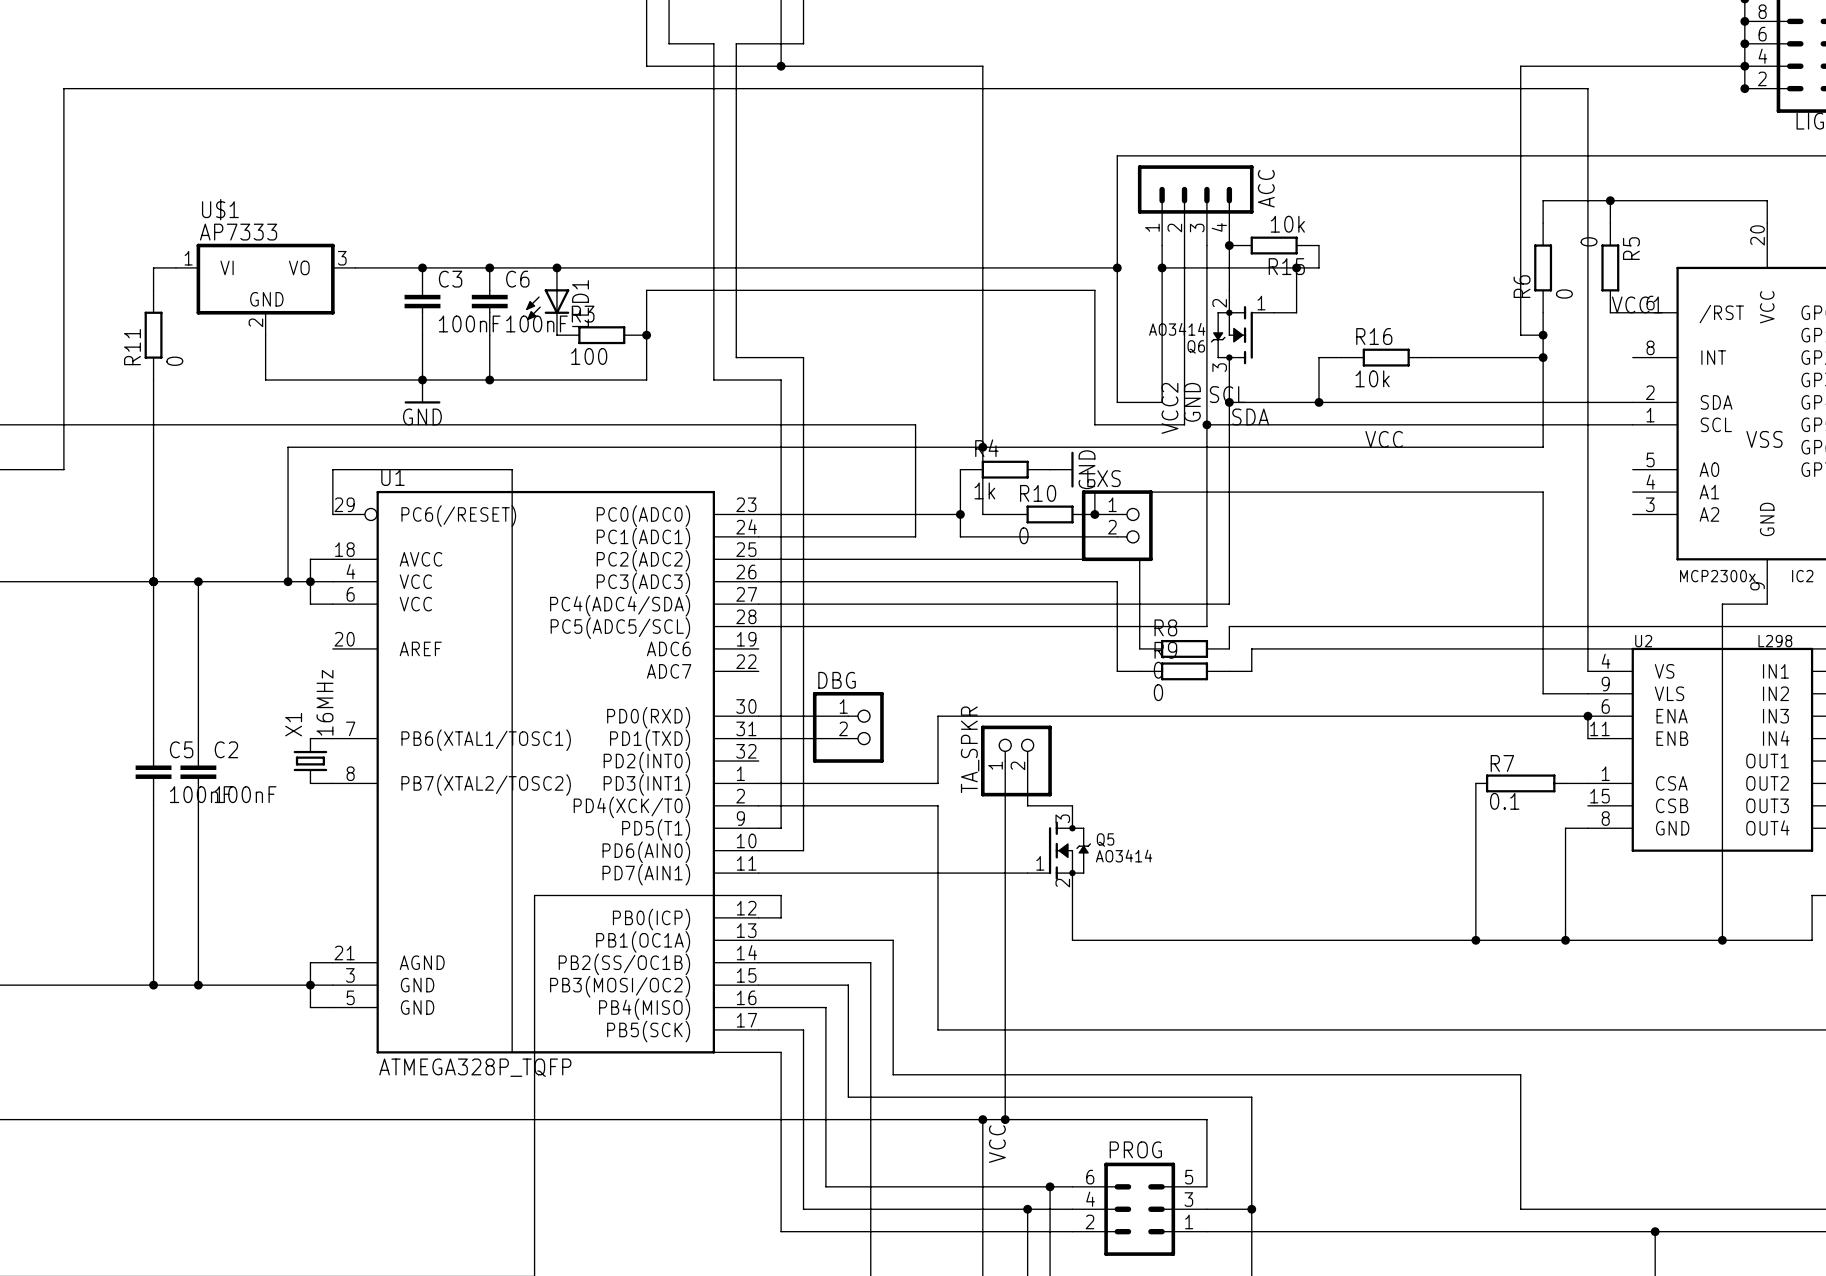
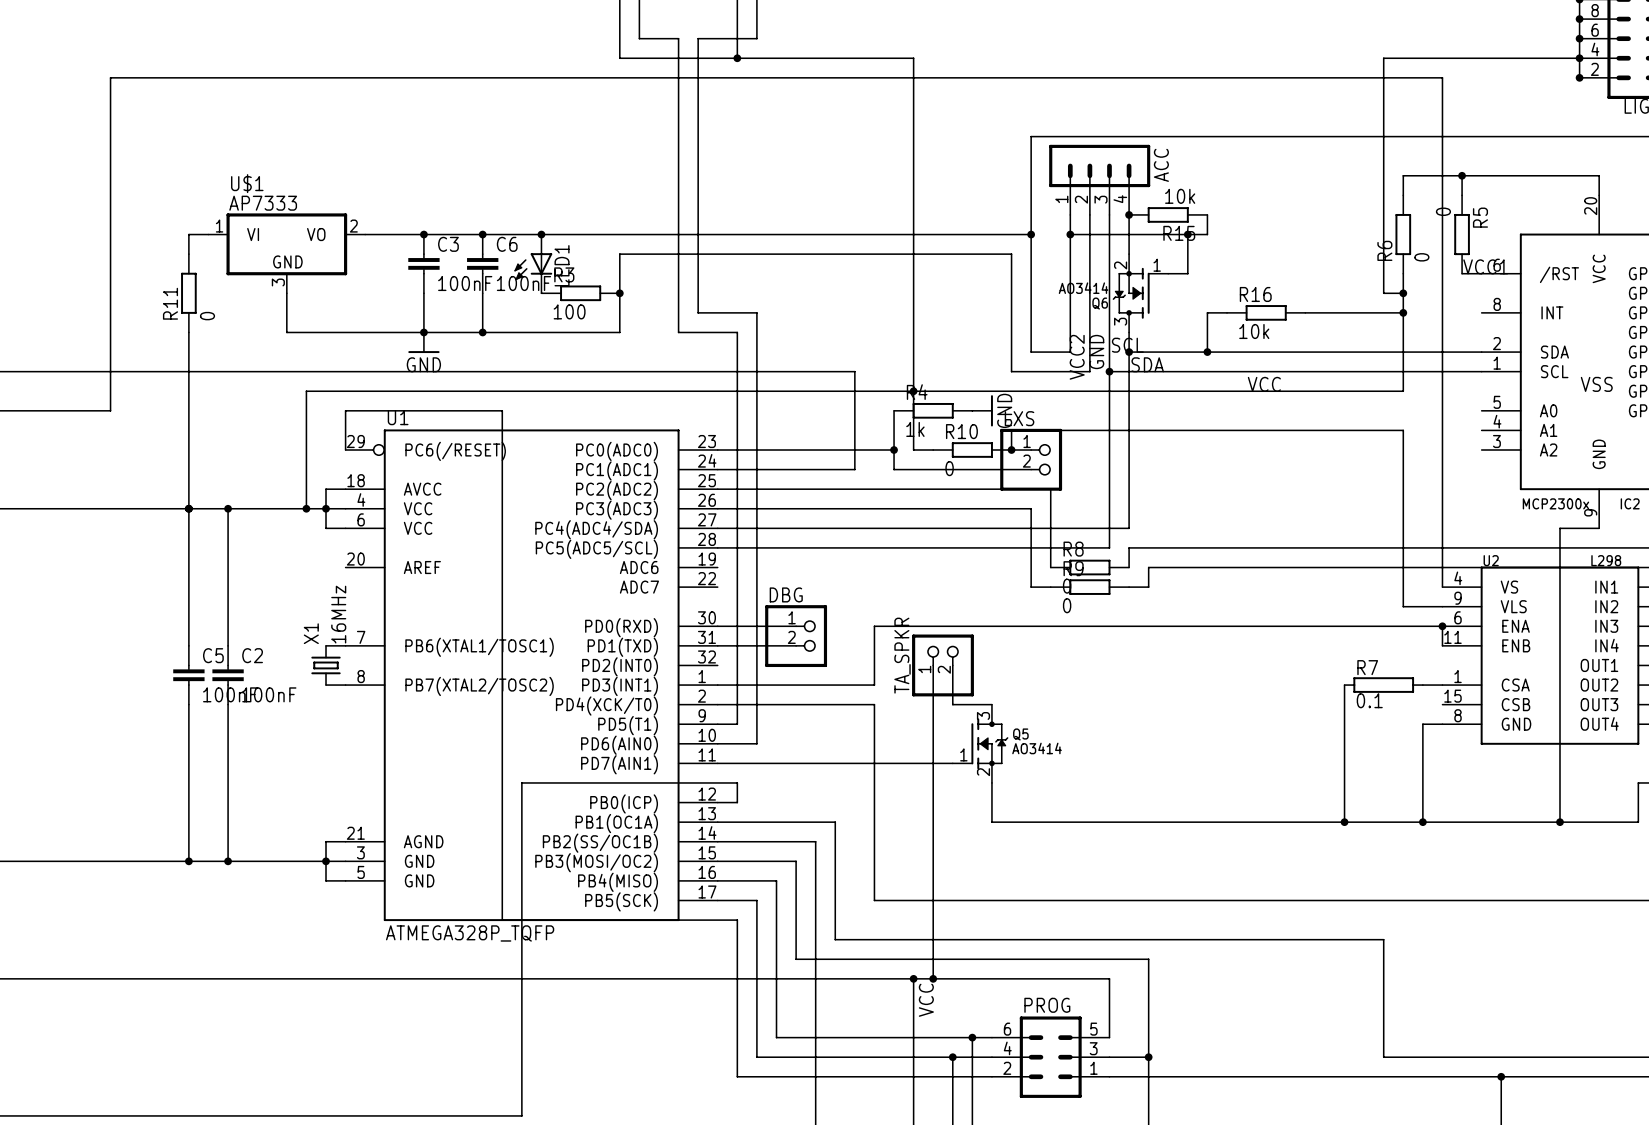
U$1 pin number: 3 (342, 258) -> 2 (353, 226)
U$1 pin number: 2 (255, 322) -> 3 (278, 282)

